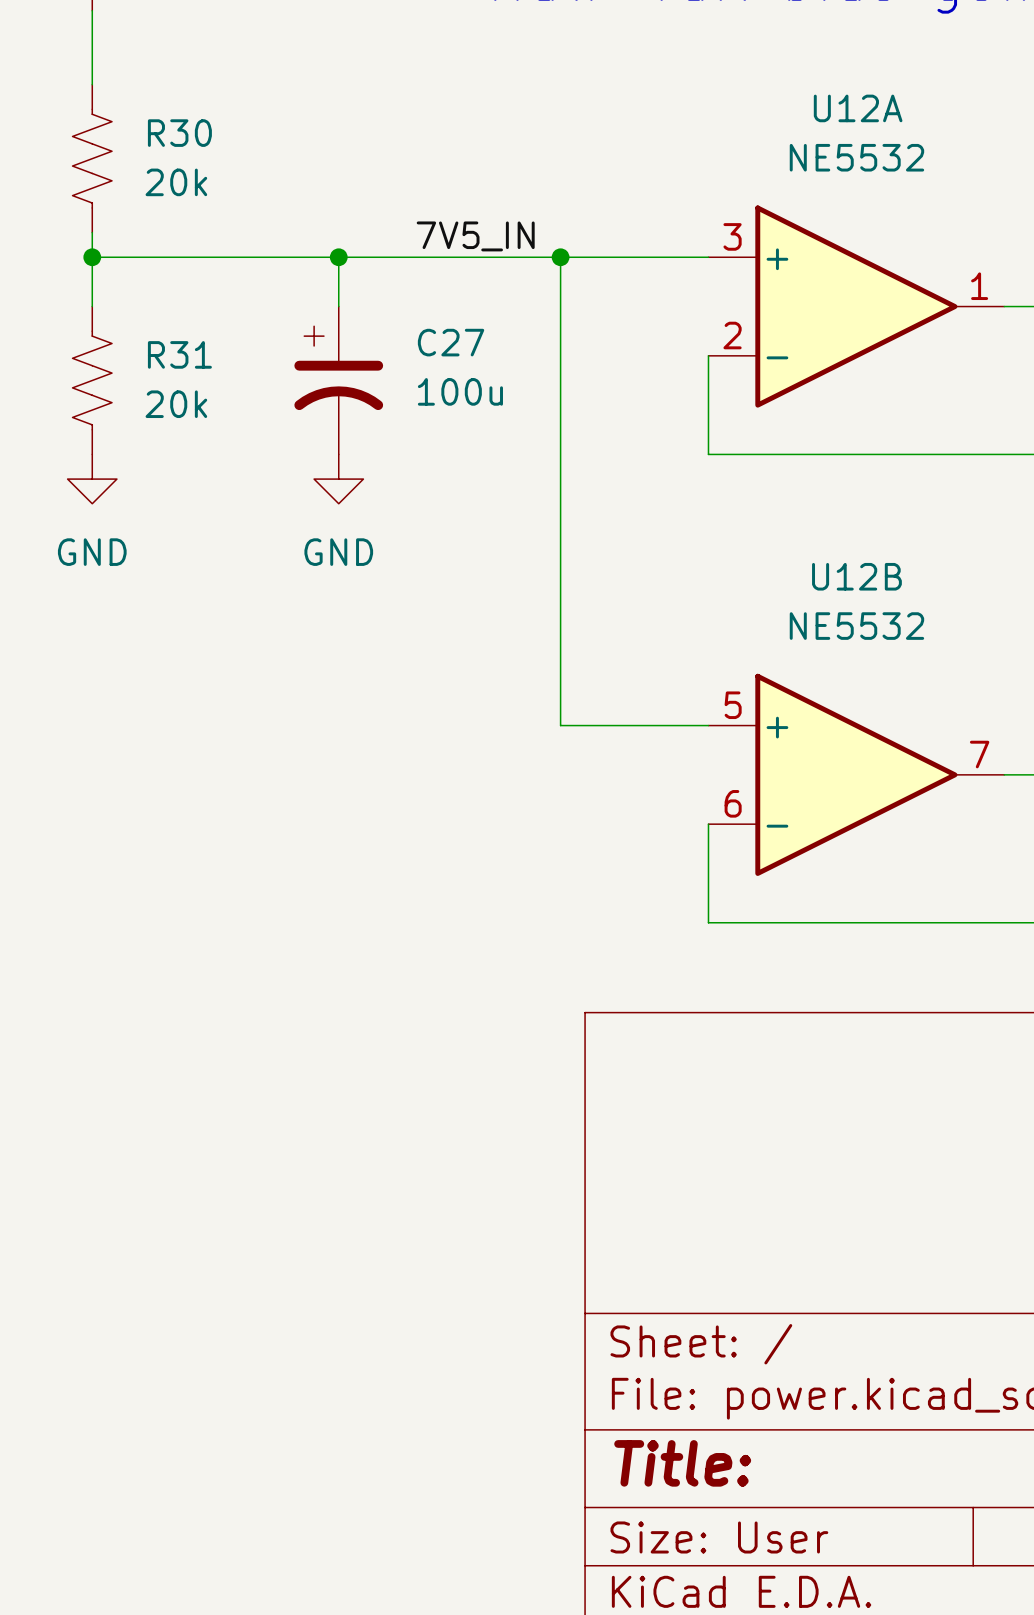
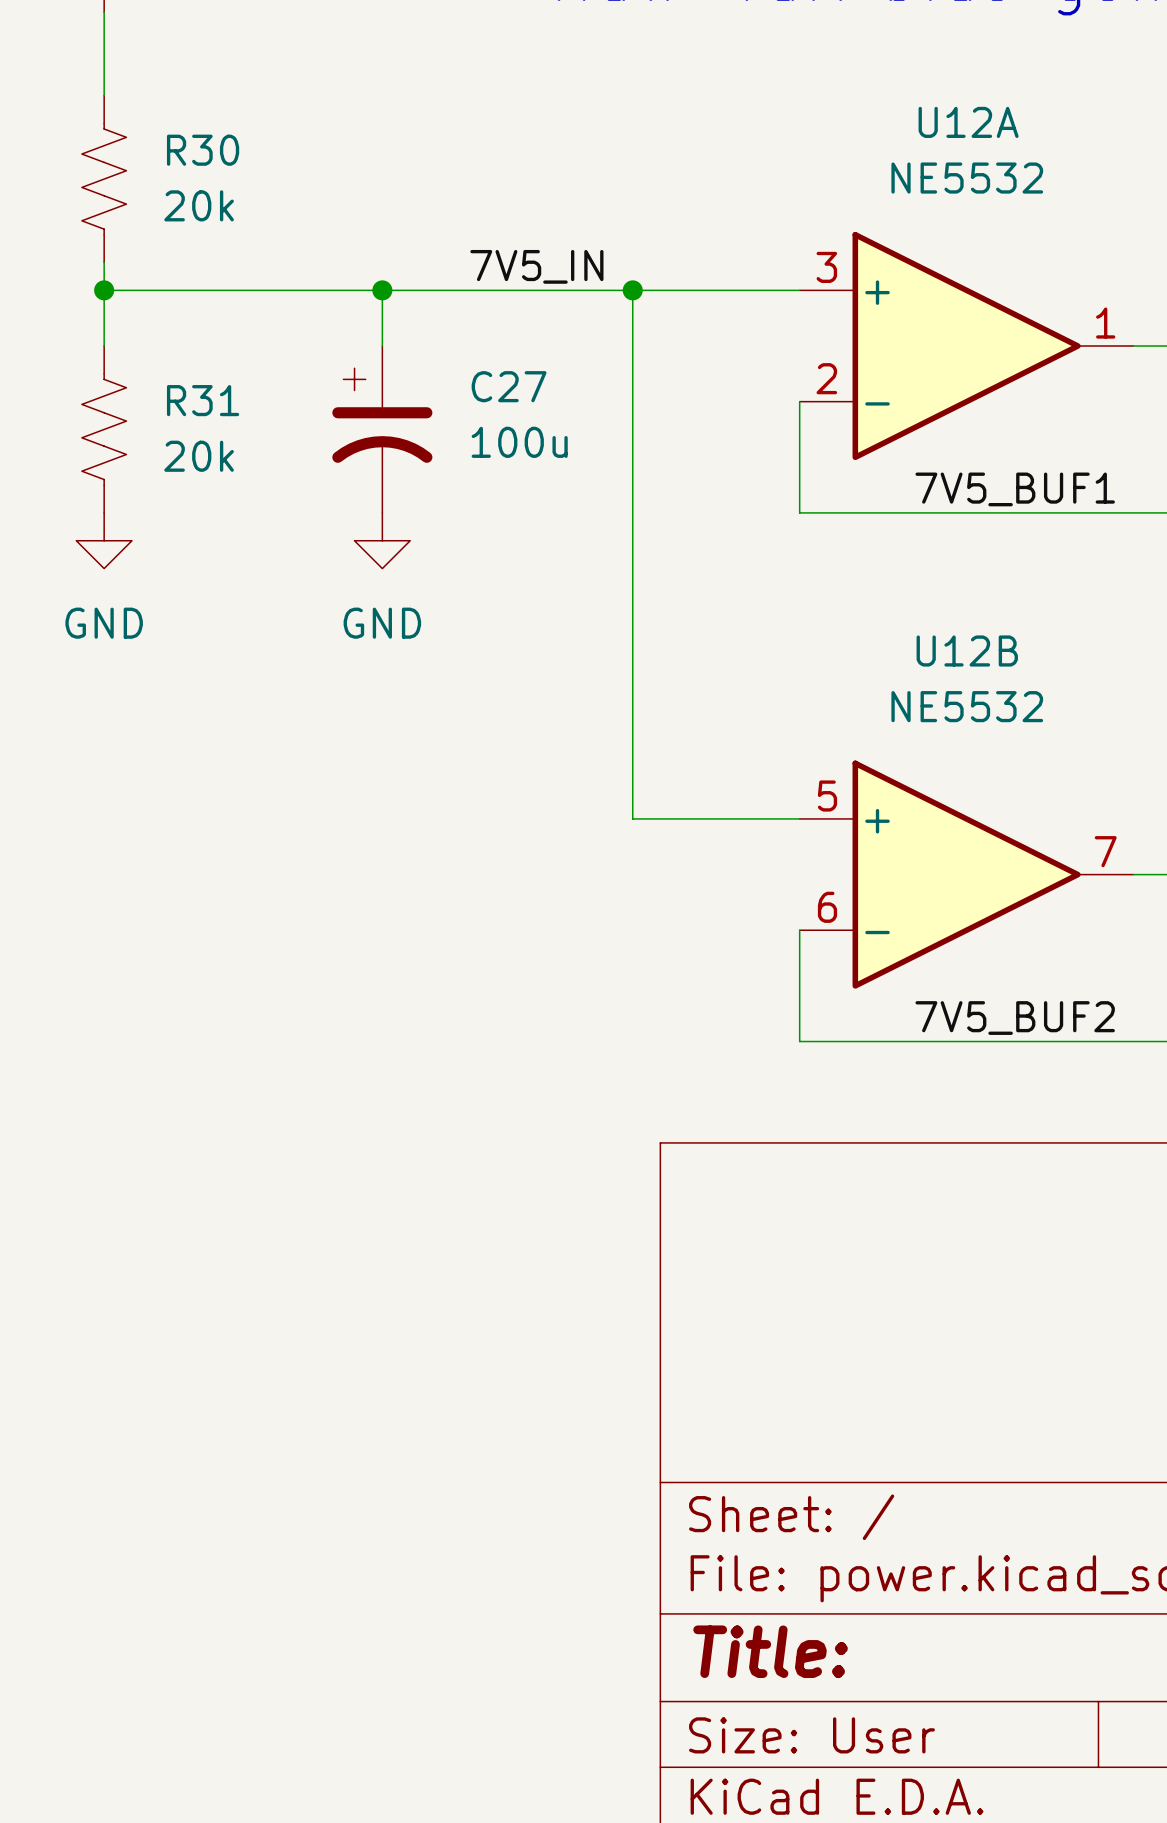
label: none -> 7V5_BUF1 (1015, 489)
label: none -> 7V5_BUF2 (1015, 1018)

